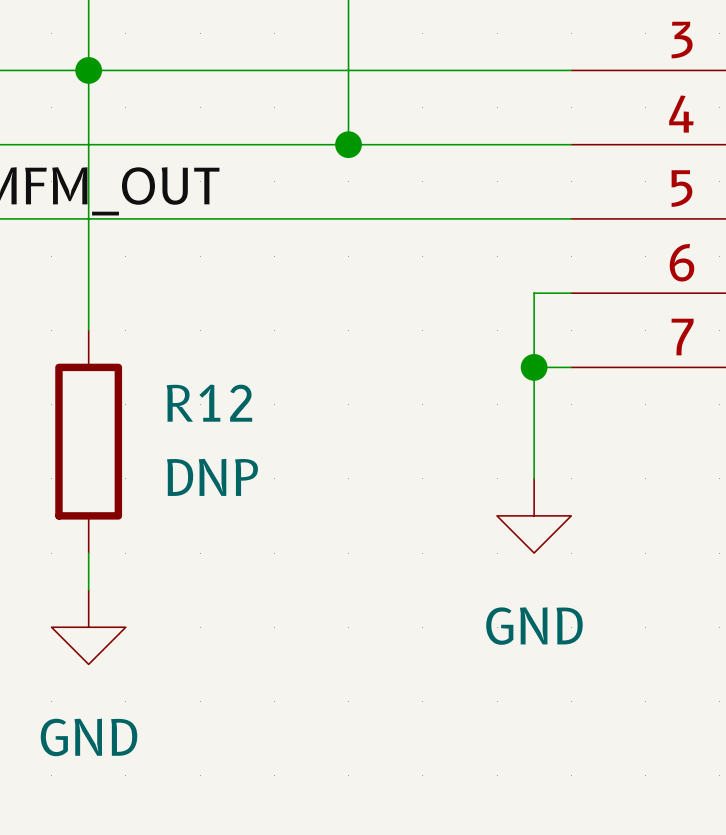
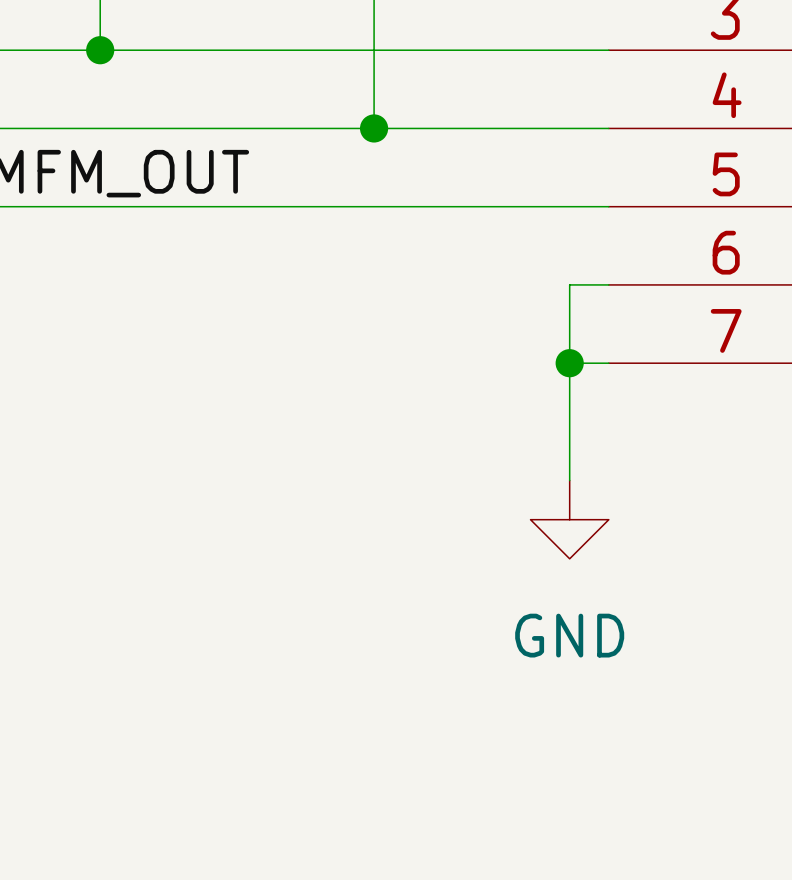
wire: (88, 70) (88, 330) -> none
R12: DNP (88, 441) -> none
wire: (88, 553) (88, 590) -> none
power symbol: GND (88, 627) -> none

